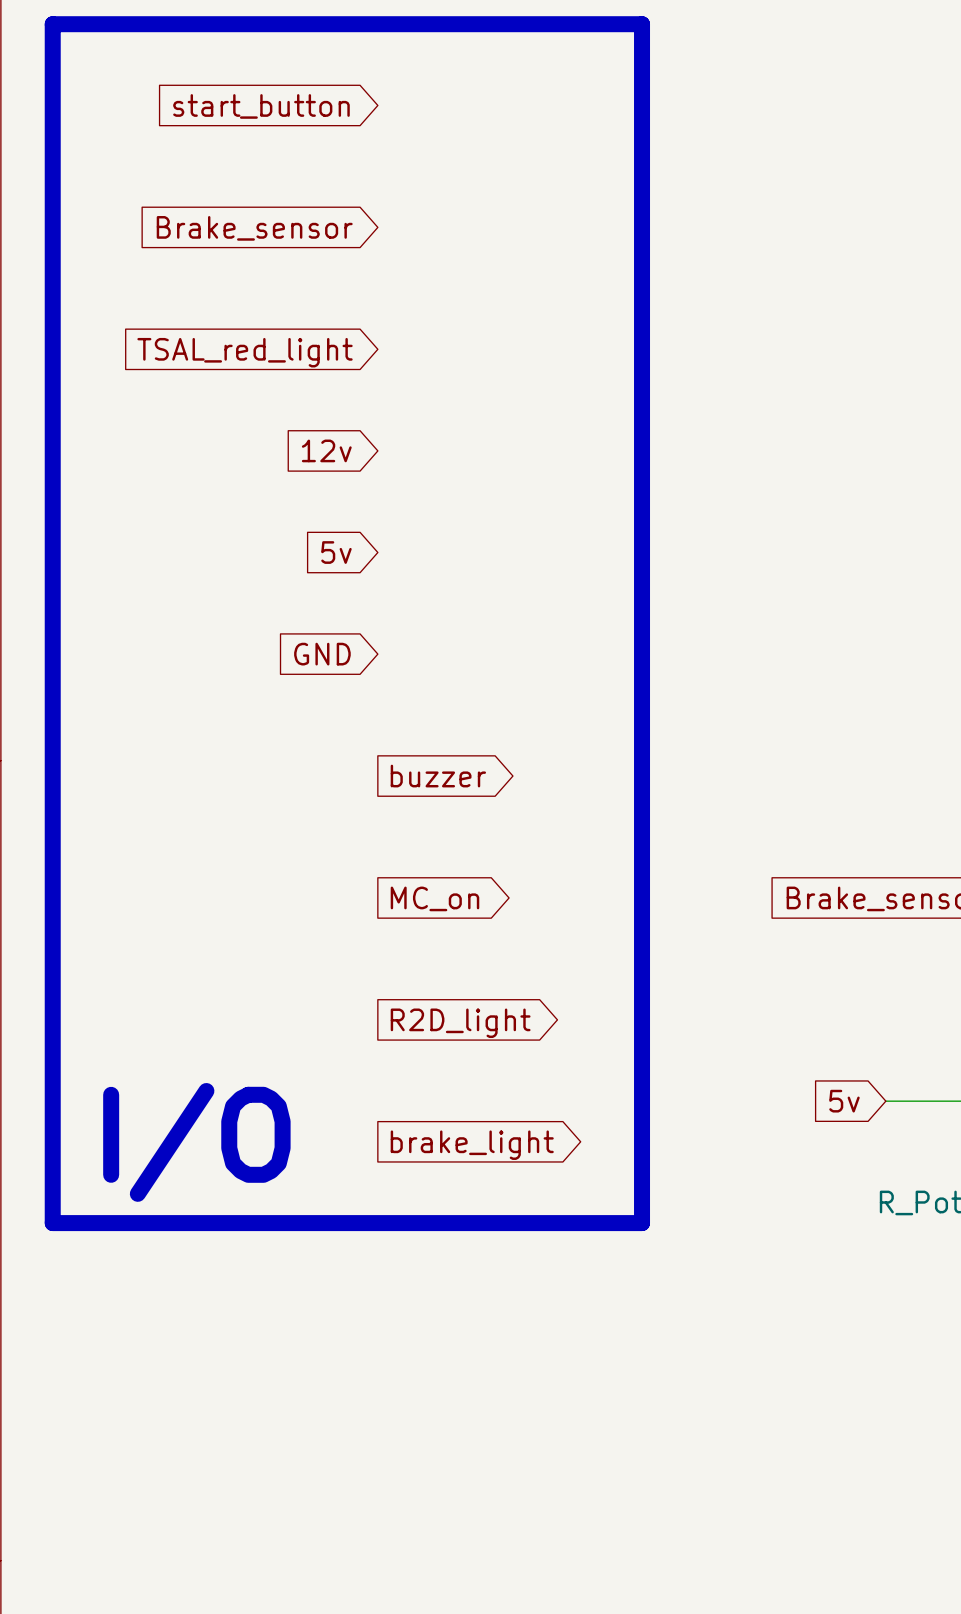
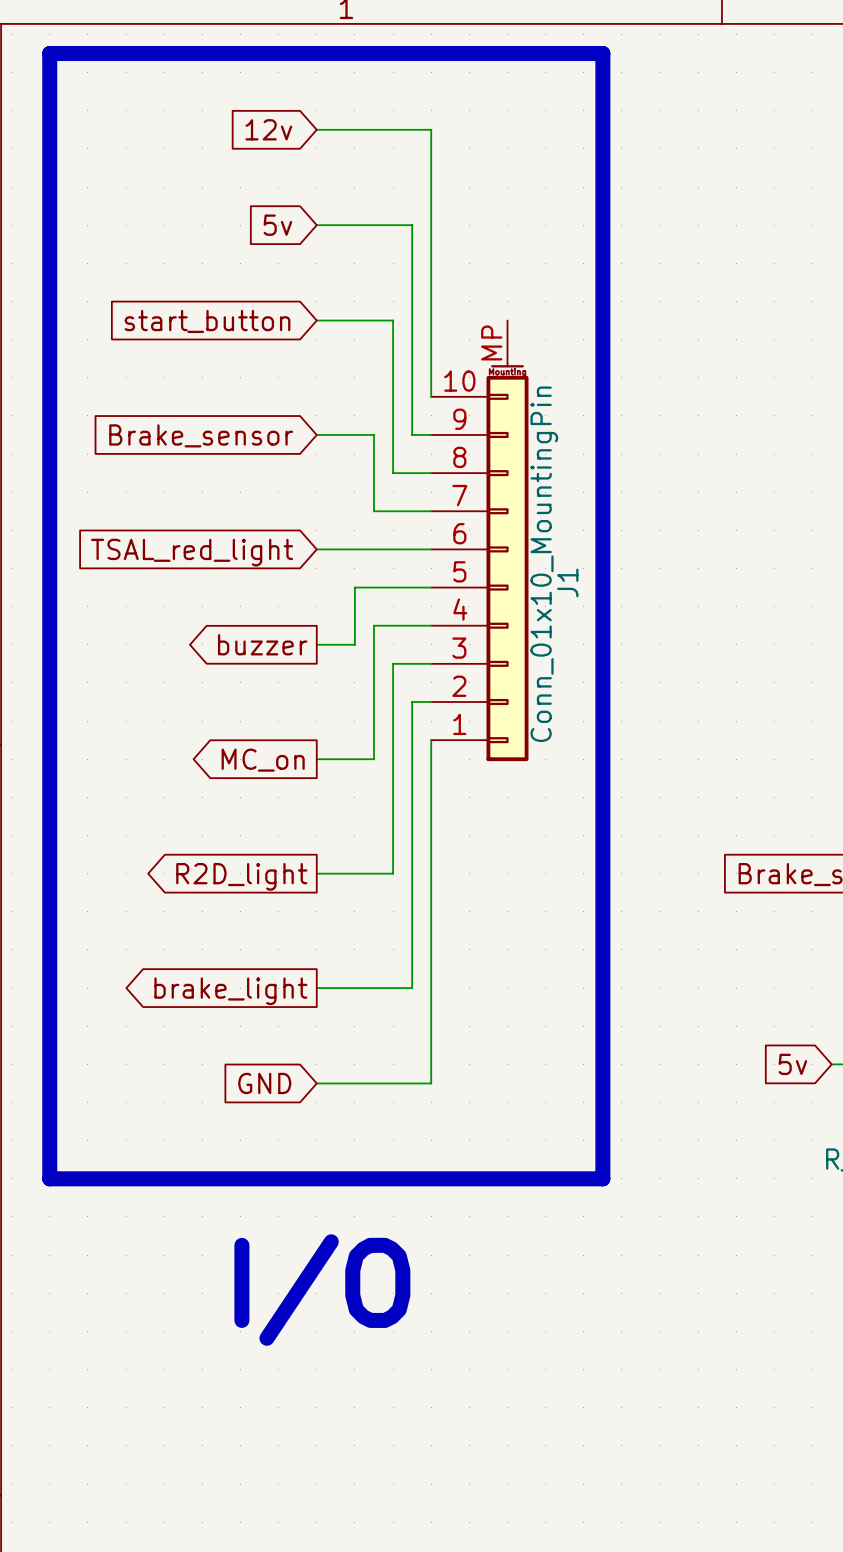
wire: none -> (316, 129) (431, 129) (431, 396)
global label position: start_button (261, 106) -> start_button (207, 321)
wire: none -> (316, 225) (412, 225) (412, 434) (431, 434)
global label position: Brake_sensor (254, 228) -> Brake_sensor (201, 435)
wire: none -> (316, 320) (393, 320) (393, 473) (431, 473)
global label position: TSAL_red_light (245, 352) -> TSAL_red_light (192, 552)
wire: none -> (316, 434) (373, 434) (373, 511) (431, 511)
global label position: 12v (326, 450) -> 12v (268, 129)
J1: none -> Conn_01x10_MountingPin (479, 540)
global label position: 5v (336, 552) -> 5v (277, 225)
wire: none -> (316, 549) (431, 549)
wire: none -> (431, 587) (354, 587) (354, 644) (316, 644)
wire: none -> (431, 625) (373, 625) (373, 759) (316, 759)
global label: GND (322, 654) -> none
wire: none -> (431, 663) (393, 663) (393, 873) (316, 873)
wire: none -> (431, 702) (412, 702) (412, 988) (316, 988)
wire: none -> (431, 740) (431, 1083) (316, 1083)
global label rotation: 0° (438, 776) -> 180° (262, 644)
global label position: buzzer (438, 776) -> buzzer (262, 644)
global label rotation: 0° (434, 898) -> 180° (263, 760)
global label position: MC_on (434, 898) -> MC_on (263, 760)
global label rotation: 0° (460, 1023) -> 180° (241, 876)
global label position: R2D_light (460, 1023) -> R2D_light (241, 876)
global label: none -> GND (264, 1083)
text position: I/O (196, 1142) -> I/O (322, 1290)
global label rotation: 0° (472, 1145) -> 180° (230, 991)
global label position: brake_light (472, 1145) -> brake_light (230, 991)

